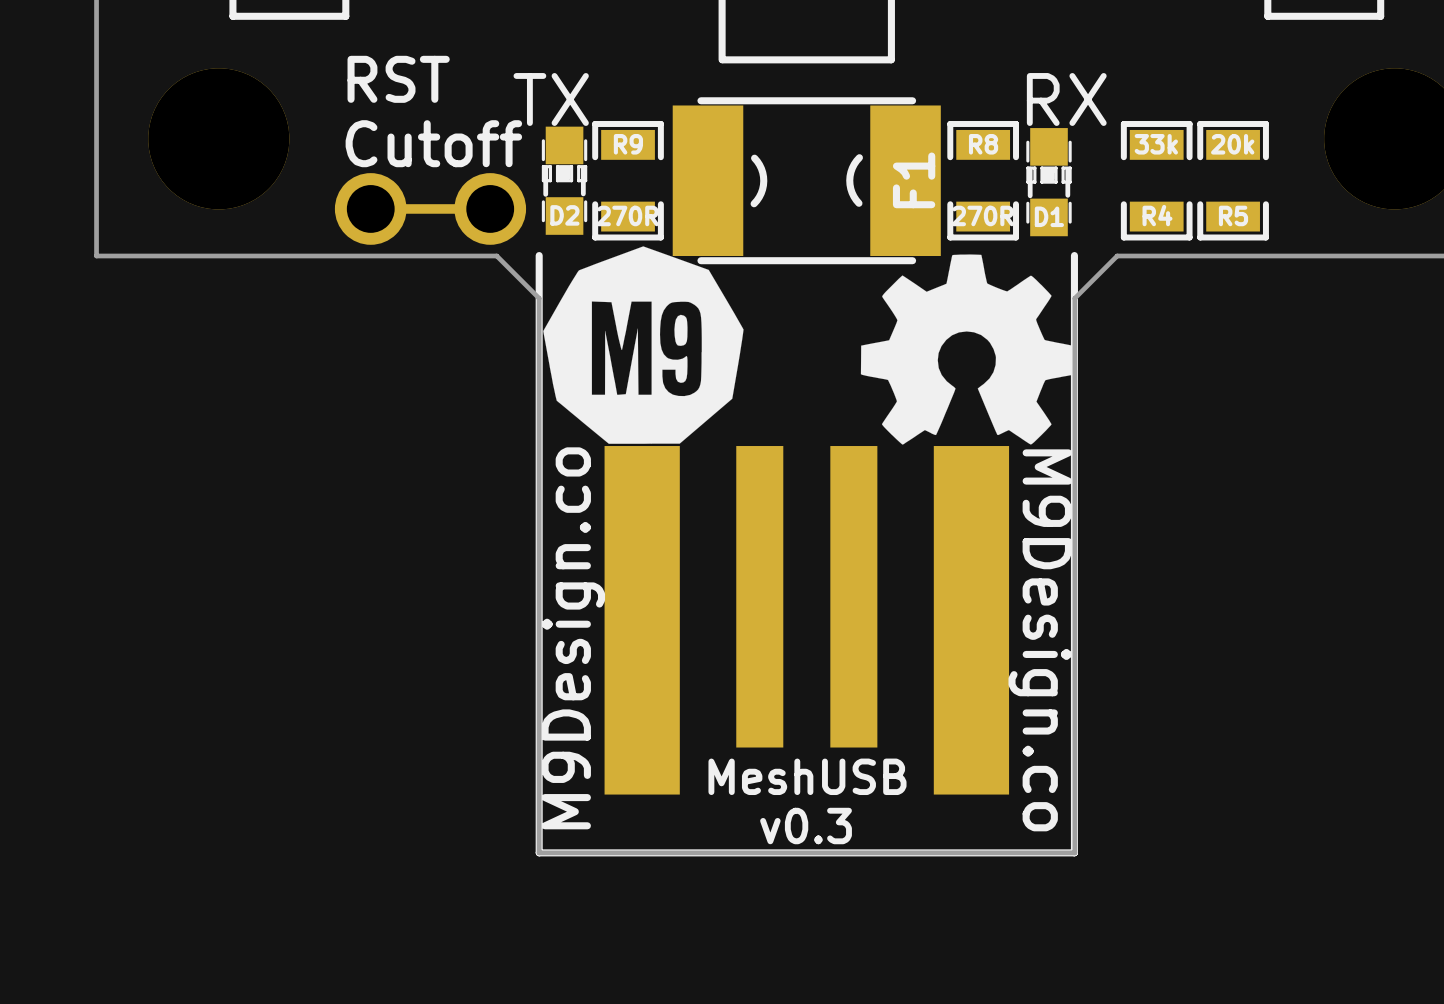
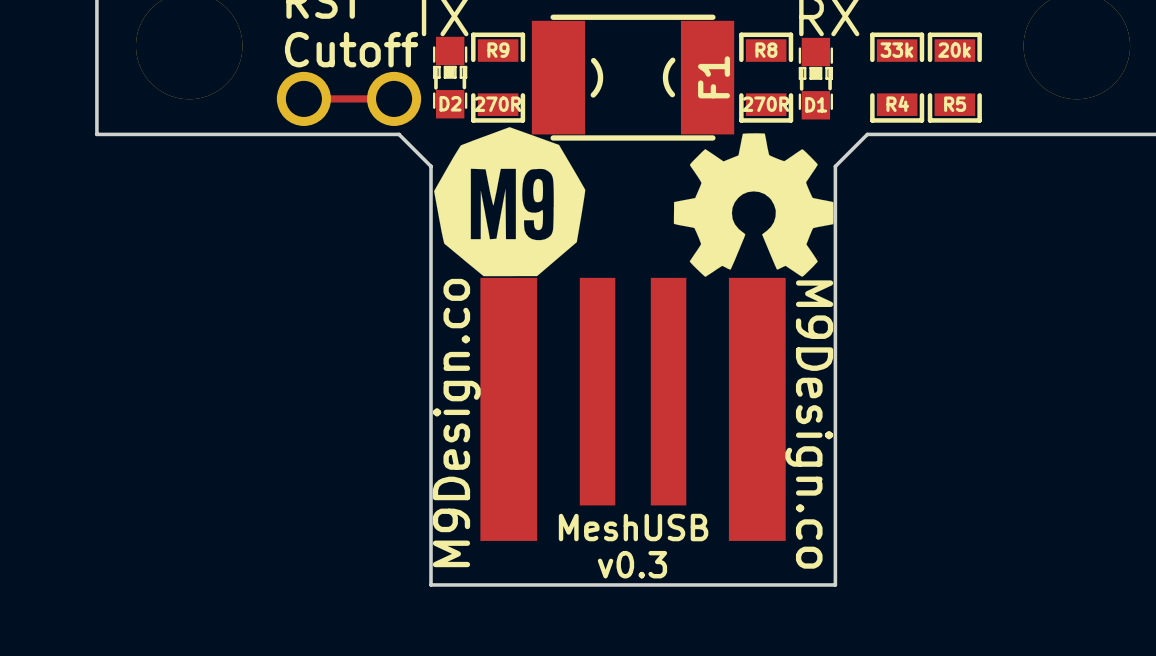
part: (806, 554) -> none

